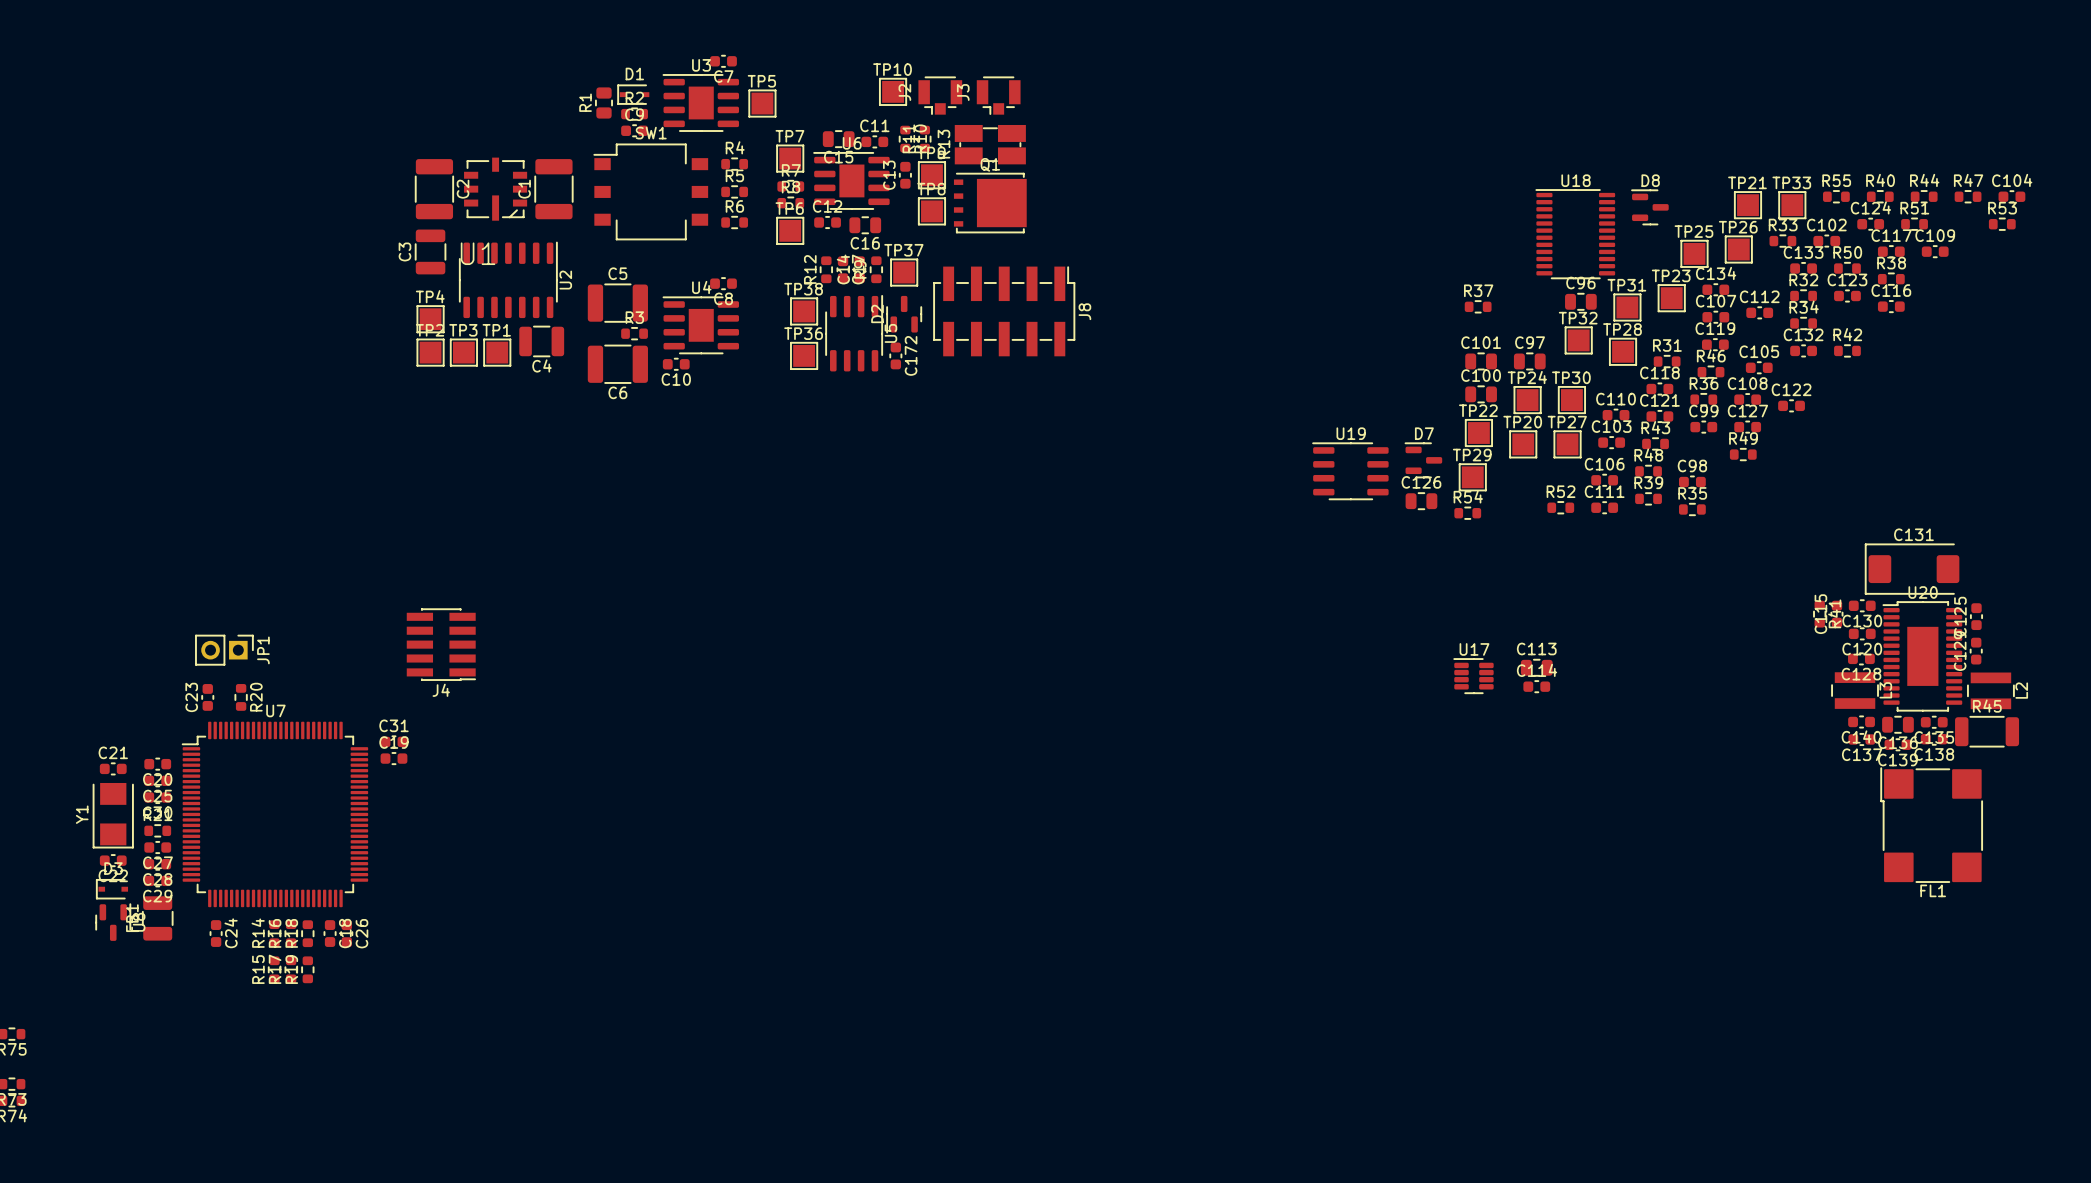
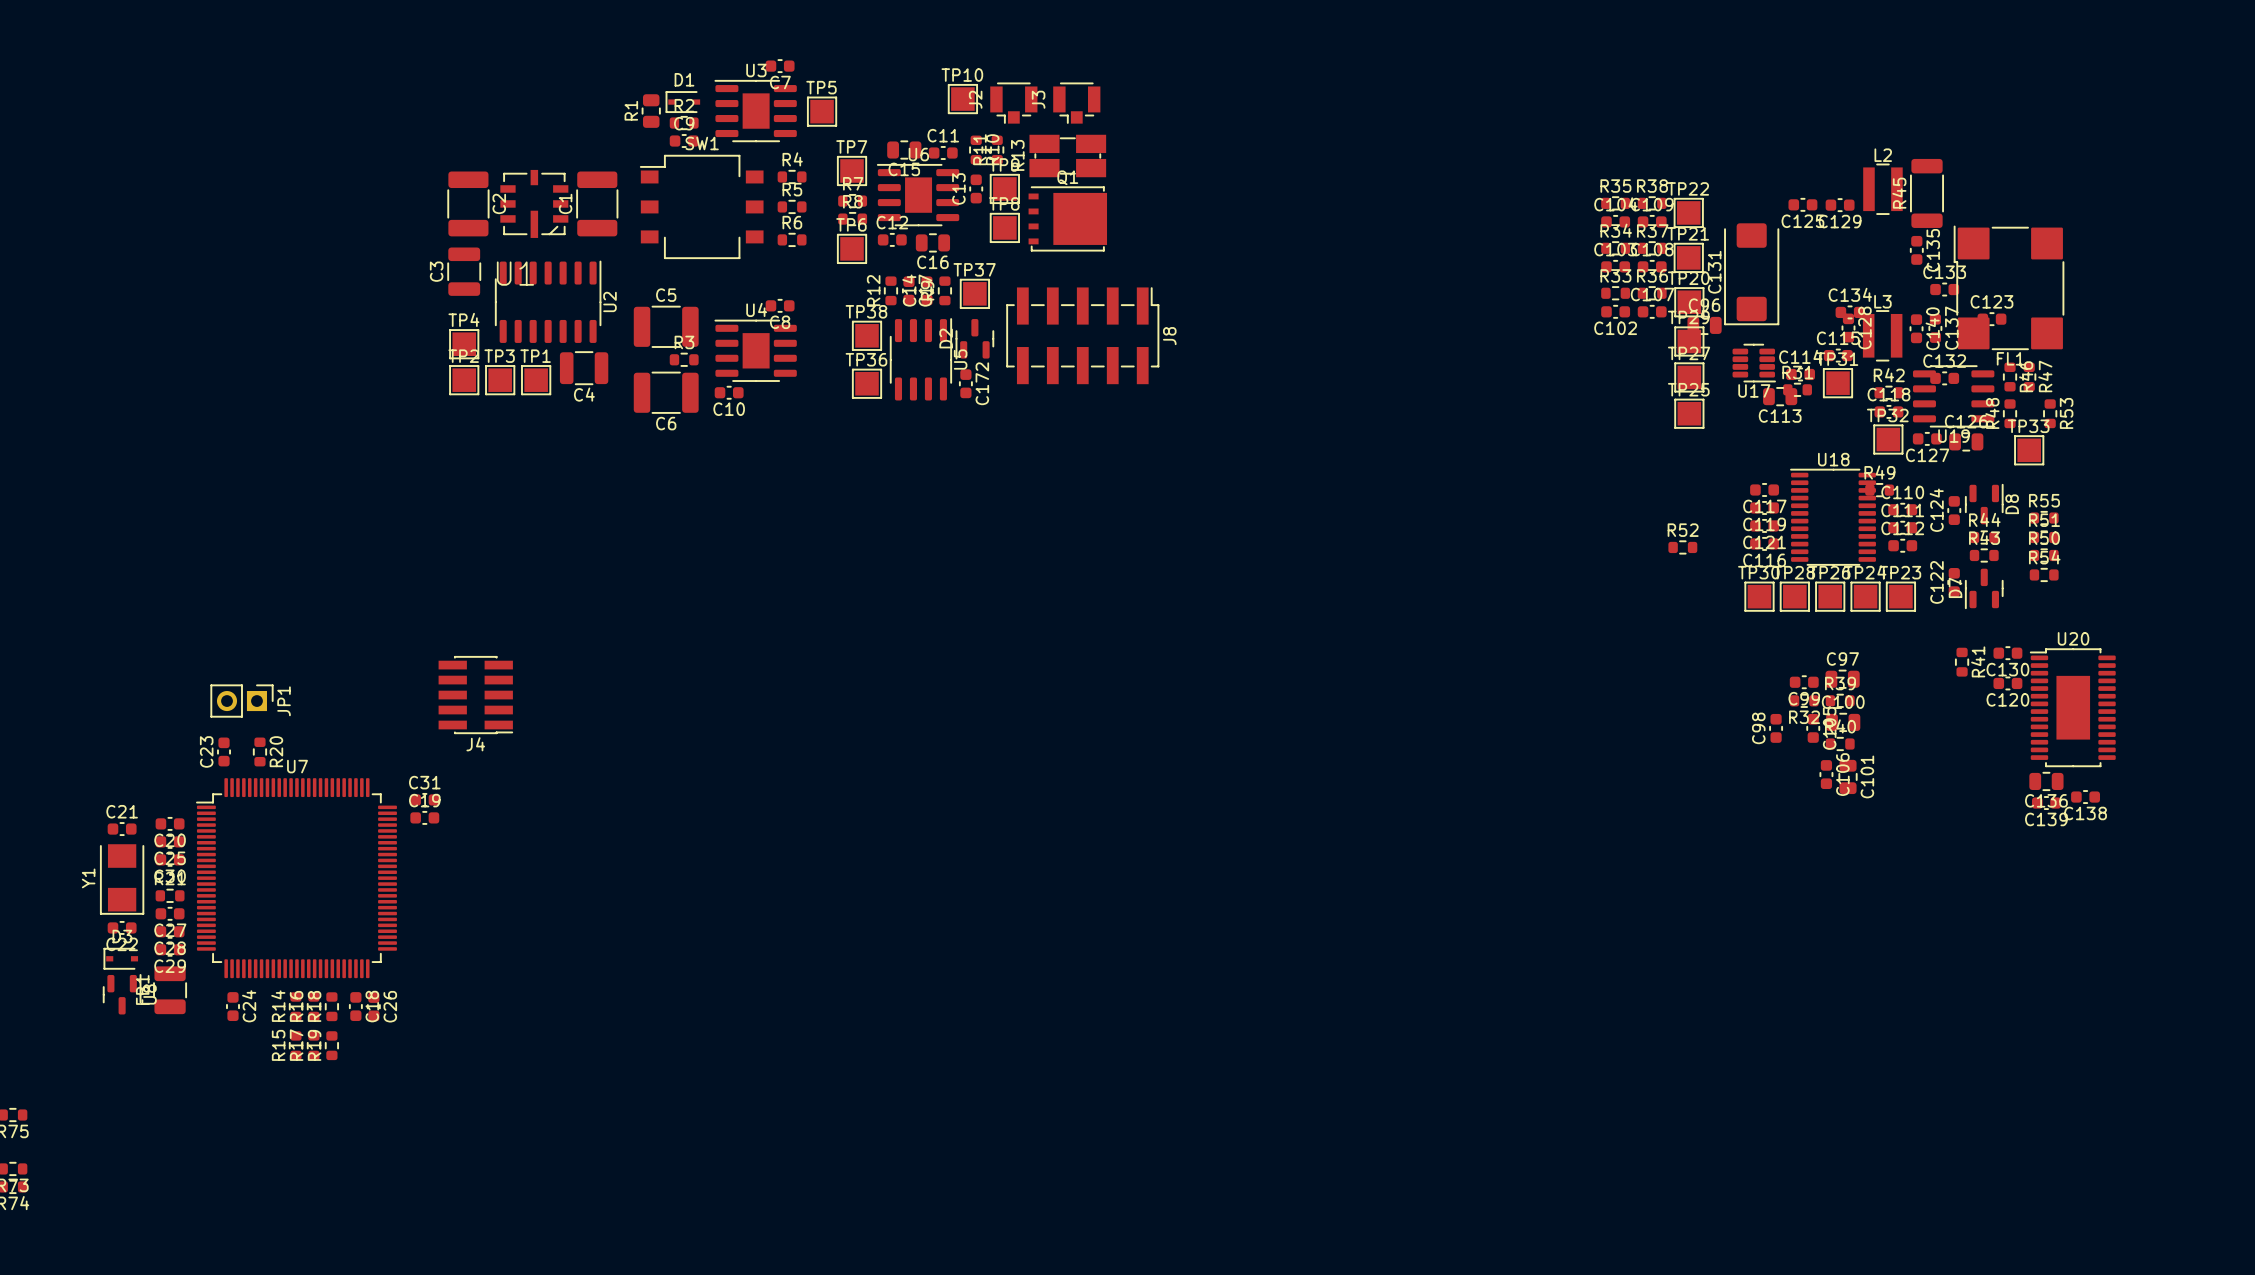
R55 position: (1836, 196) -> (2044, 518)
R40 position: (1880, 196) -> (1840, 743)
R44 position: (1924, 196) -> (1984, 537)
R47 rotation: 0° (1968, 196) -> 90° clockwise (2029, 377)
R47 position: (1968, 196) -> (2029, 377)
C104 position: (2011, 196) -> (1615, 221)
TP21 position: (1747, 205) -> (1688, 257)
TP33 position: (1792, 205) -> (2029, 450)
D8 rotation: 0° (1650, 207) -> 90° clockwise (1984, 504)
D8 position: (1650, 207) -> (1984, 504)
C124 name position: C124 (1870, 207) -> C124 (1936, 510)
C124 rotation: 0° (1870, 224) -> 90° clockwise (1954, 510)
C124 position: (1870, 224) -> (1954, 510)
R51 position: (1914, 224) -> (2044, 537)
R53 rotation: 0° (2002, 224) -> 90° clockwise (2050, 413)
R53 position: (2002, 224) -> (2050, 413)
C102 name position: C102 (1826, 225) -> C102 (1615, 328)
U18 position: (1575, 234) -> (1833, 517)
C117 name position: C117 (1891, 235) -> C117 (1764, 506)
R33 position: (1782, 241) -> (1615, 293)
C102 position: (1826, 241) -> (1615, 311)
TP26 position: (1738, 249) -> (1830, 596)
C117 position: (1891, 251) -> (1764, 489)
C109 position: (1935, 251) -> (1652, 221)
TP25 position: (1694, 253) -> (1689, 413)
R50 position: (1847, 268) -> (2044, 555)
R32 name position: R32 (1803, 279) -> R32 (1804, 717)
R38 position: (1891, 279) -> (1652, 203)
C116 name position: C116 (1891, 290) -> C116 (1764, 560)
R32 position: (1803, 296) -> (1804, 700)
TP23 position: (1671, 298) -> (1900, 596)
R37 position: (1478, 306) -> (1652, 248)
C116 position: (1891, 306) -> (1764, 543)
TP31 position: (1627, 307) -> (1838, 383)
C112 position: (1759, 312) -> (1902, 545)
C107 position: (1715, 317) -> (1652, 311)
R34 position: (1803, 323) -> (1615, 248)
C119 name position: C119 (1715, 328) -> C119 (1764, 524)
TP32 position: (1578, 340) -> (1888, 439)
C119 position: (1715, 344) -> (1764, 507)
R42 position: (1847, 350) -> (1888, 392)
TP28 position: (1623, 351) -> (1794, 596)
C101 rotation: 0° (1481, 361) -> 90° clockwise (1848, 776)
C101 position: (1481, 361) -> (1848, 776)
C97 position: (1529, 361) -> (1842, 679)
C105 rotation: 0° (1759, 367) -> 90° clockwise (1813, 728)
C105 position: (1759, 367) -> (1813, 728)
R46 rotation: 0° (1711, 372) -> 90° clockwise (2010, 377)
R46 position: (1711, 372) -> (2010, 377)
C118 position: (1659, 389) -> (1888, 411)
C122 name position: C122 (1791, 389) -> C122 (1936, 582)
C100 position: (1481, 394) -> (1843, 722)
R36 position: (1703, 399) -> (1652, 293)
C108 position: (1747, 399) -> (1652, 266)
TP24 position: (1527, 400) -> (1865, 596)
TP30 position: (1571, 400) -> (1759, 596)
C121 name position: C121 (1659, 400) -> C121 (1764, 542)
C122 rotation: 0° (1791, 405) -> 90° clockwise (1954, 582)
C122 position: (1791, 405) -> (1954, 582)
C99 name position: C99 (1703, 411) -> C99 (1804, 698)
C127 name position: C127 (1747, 411) -> C127 (1927, 455)
C110 position: (1616, 415) -> (1902, 509)
C121 position: (1659, 416) -> (1764, 525)
C99 position: (1703, 427) -> (1804, 682)
C127 position: (1747, 427) -> (1927, 438)
TP22 position: (1478, 433) -> (1688, 212)
C103 position: (1611, 442) -> (1615, 266)
R43 position: (1655, 443) -> (1984, 555)
TP20 position: (1523, 444) -> (1689, 302)
TP27 position: (1567, 444) -> (1689, 377)
R48 name position: R48 (1648, 455) -> R48 (1992, 413)
D7 rotation: 0° (1423, 460) -> 90° counterclockwise (1984, 588)
D7 position: (1423, 460) -> (1984, 588)
C98 name position: C98 (1692, 465) -> C98 (1758, 728)
U19 rotation: 0° (1350, 471) -> 180° (1954, 396)
U19 position: (1350, 471) -> (1954, 396)
R48 rotation: 0° (1648, 471) -> 90° clockwise (2010, 413)
R48 position: (1648, 471) -> (2010, 413)
TP29 position: (1472, 477) -> (1689, 341)
C106 rotation: 0° (1604, 480) -> 90° clockwise (1826, 774)
C106 position: (1604, 480) -> (1826, 774)
C98 rotation: 0° (1692, 482) -> 90° clockwise (1776, 728)
C98 position: (1692, 482) -> (1776, 728)
R39 position: (1648, 498) -> (1840, 700)
C126 position: (1421, 501) -> (1966, 441)
C111 position: (1604, 507) -> (1902, 527)
R35 position: (1692, 509) -> (1615, 203)
R54 position: (1467, 513) -> (2044, 574)
C131 rotation: 0° (1912, 569) -> 90° counterclockwise (1751, 274)
C131 position: (1912, 569) -> (1751, 274)
C115 rotation: 0° (1836, 614) -> 90° clockwise (1838, 355)
C115 position: (1836, 614) -> (1838, 355)
C125 name position: C125 (1960, 616) -> C125 (1802, 221)
C125 rotation: 0° (1976, 616) -> 90° clockwise (1802, 204)
C125 position: (1976, 616) -> (1802, 204)
C113 name position: C113 (1536, 648) -> C113 (1780, 416)
C129 name position: C129 (1960, 651) -> C129 (1840, 221)
C129 rotation: 0° (1976, 651) -> 90° clockwise (1840, 205)
C129 position: (1976, 651) -> (1840, 205)
C128 rotation: 0° (1861, 658) -> 90° clockwise (1848, 328)
C128 position: (1861, 658) -> (1848, 328)
C113 position: (1536, 667) -> (1780, 396)
C128 name position: C128 (1861, 674) -> C128 (1864, 328)
U17 rotation: 0° (1473, 676) -> 180° (1754, 363)
U17 position: (1473, 676) -> (1754, 363)
C114 position: (1536, 686) -> (1800, 374)
L3 rotation: 0° (1855, 690) -> 90° clockwise (1882, 335)
L3 position: (1855, 690) -> (1882, 335)
L3 name position: L3 (1885, 690) -> L3 (1882, 301)
L2 rotation: 0° (1990, 690) -> 90° clockwise (1882, 189)
L2 position: (1990, 690) -> (1882, 189)
L2 name position: L2 (2021, 690) -> L2 (1883, 155)
R45 name position: R45 (1987, 706) -> R45 (1899, 193)
C140 rotation: 0° (1861, 721) -> 90° clockwise (1916, 328)
C140 position: (1861, 721) -> (1916, 328)
C135 rotation: 0° (1934, 722) -> 90° clockwise (1916, 250)
C135 position: (1934, 722) -> (1916, 250)
R45 rotation: 0° (1987, 731) -> 90° clockwise (1927, 193)
R45 position: (1987, 731) -> (1927, 193)
C140 name position: C140 (1861, 736) -> C140 (1932, 328)
C135 name position: C135 (1934, 737) -> C135 (1933, 250)
C137 rotation: 0° (1861, 739) -> 90° clockwise (1935, 328)
C137 position: (1861, 739) -> (1935, 328)
C137 name position: C137 (1862, 754) -> C137 (1951, 328)
FL1 position: (1931, 825) -> (2009, 287)

